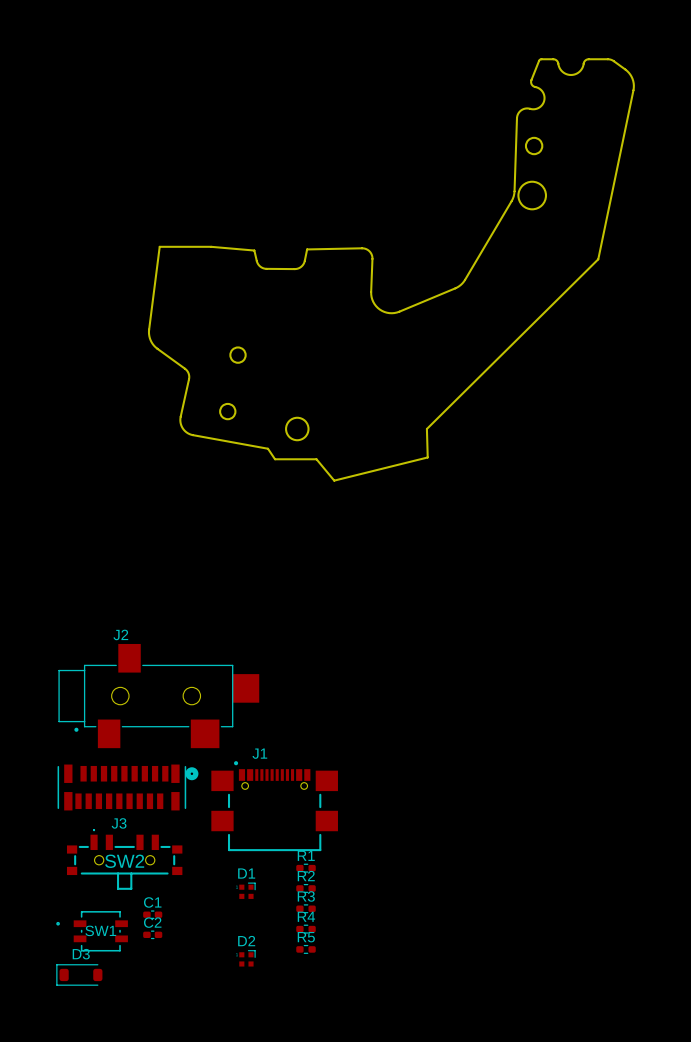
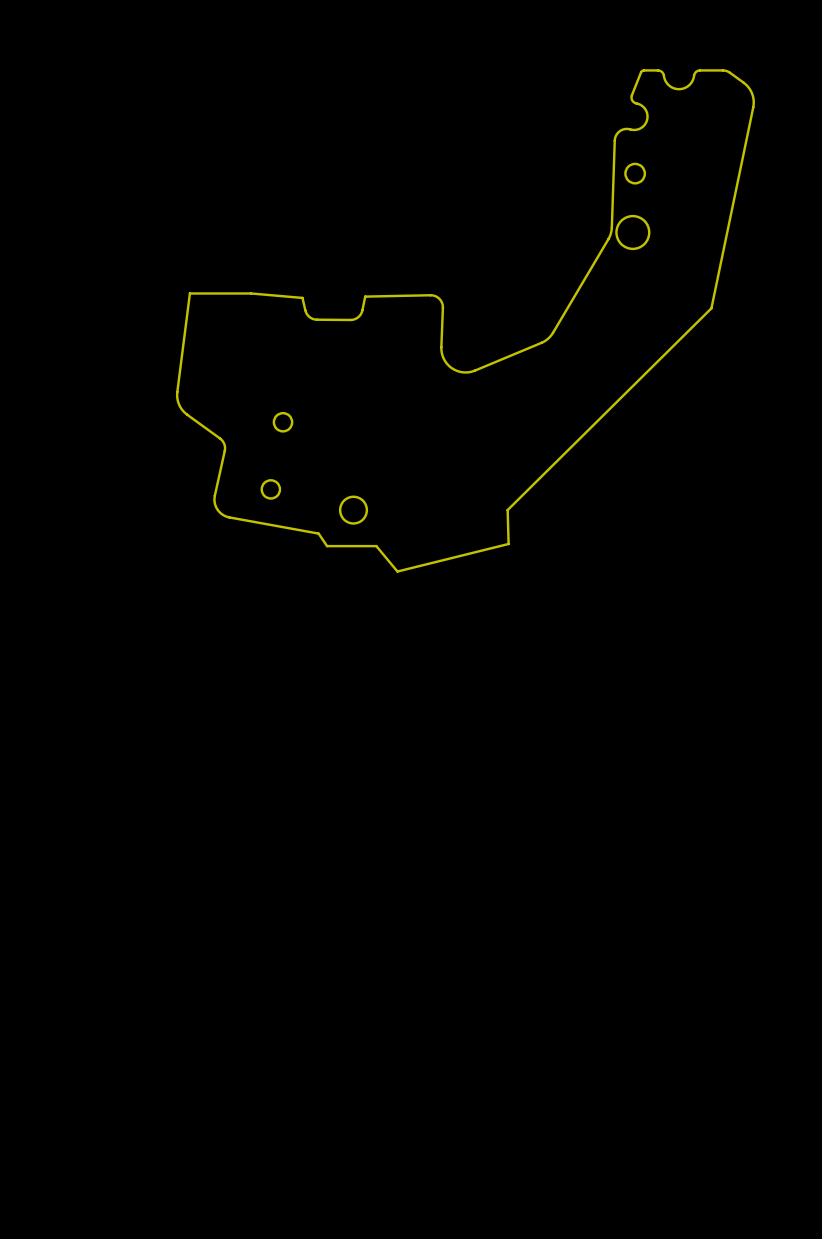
J2: (158, 696) -> none
J3: (127, 787) -> none
J1: (274, 806) -> none
SW2: (124, 859) -> none
R1: (306, 868) -> none
R2: (306, 888) -> none
D1: (247, 890) -> none
R3: (306, 908) -> none
C1: (152, 914) -> none
R4: (306, 929) -> none
SW1: (92, 931) -> none
C2: (152, 934) -> none
R5: (306, 949) -> none
D2: (247, 958) -> none
D3: (79, 974) -> none

